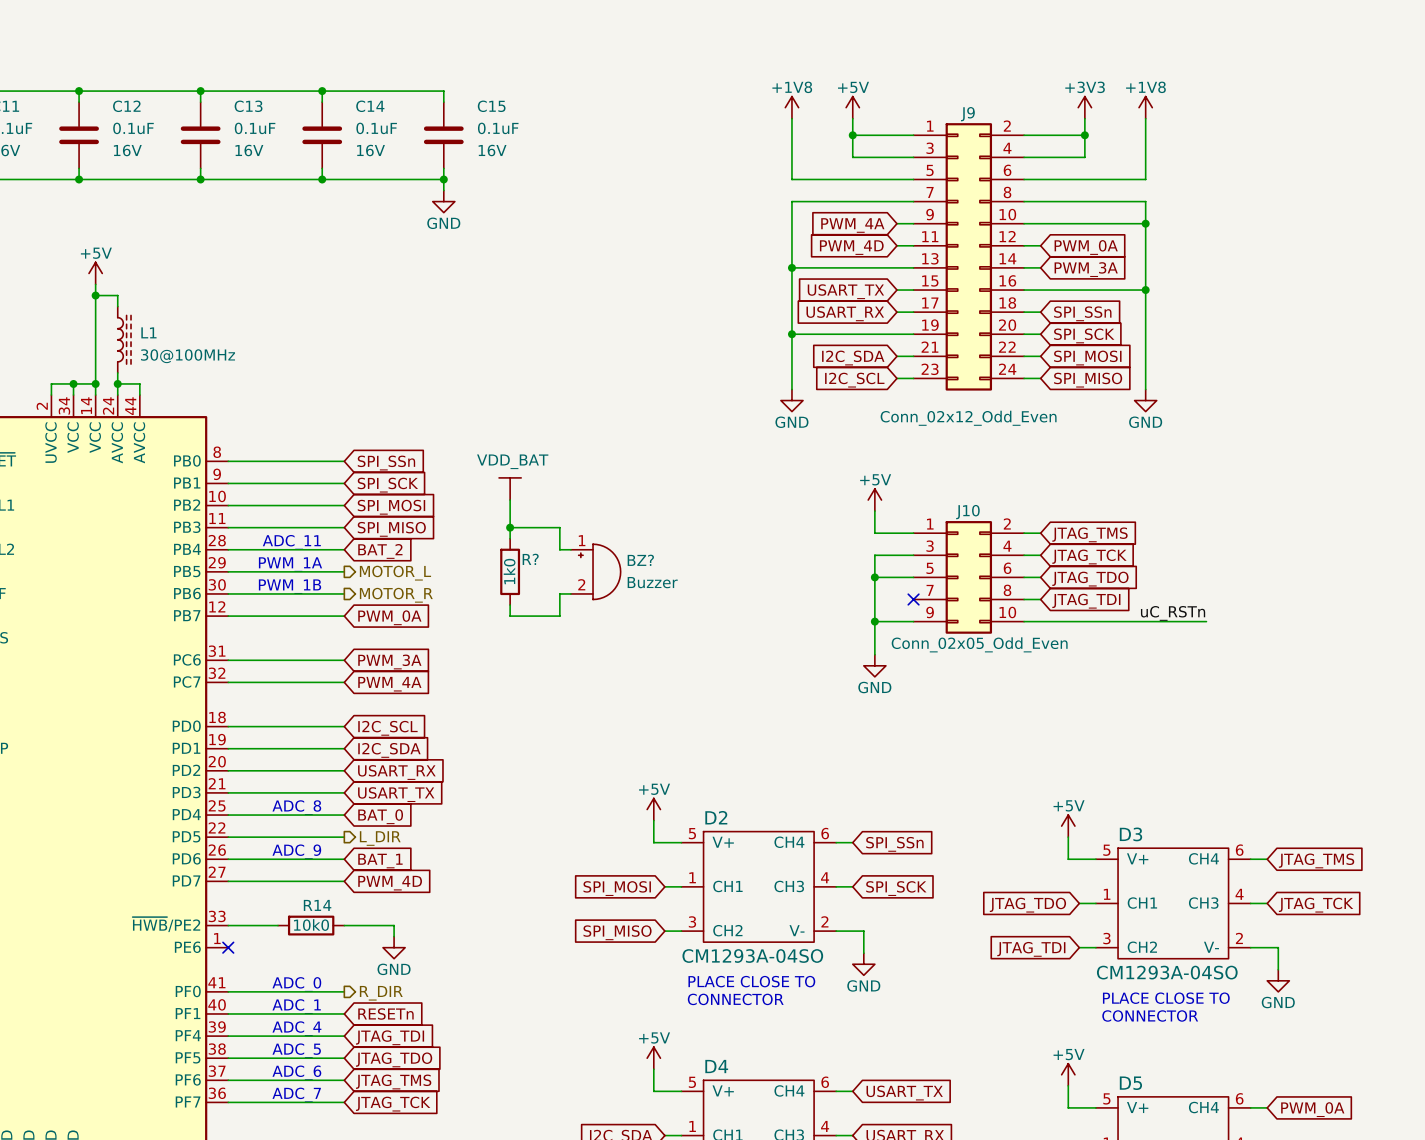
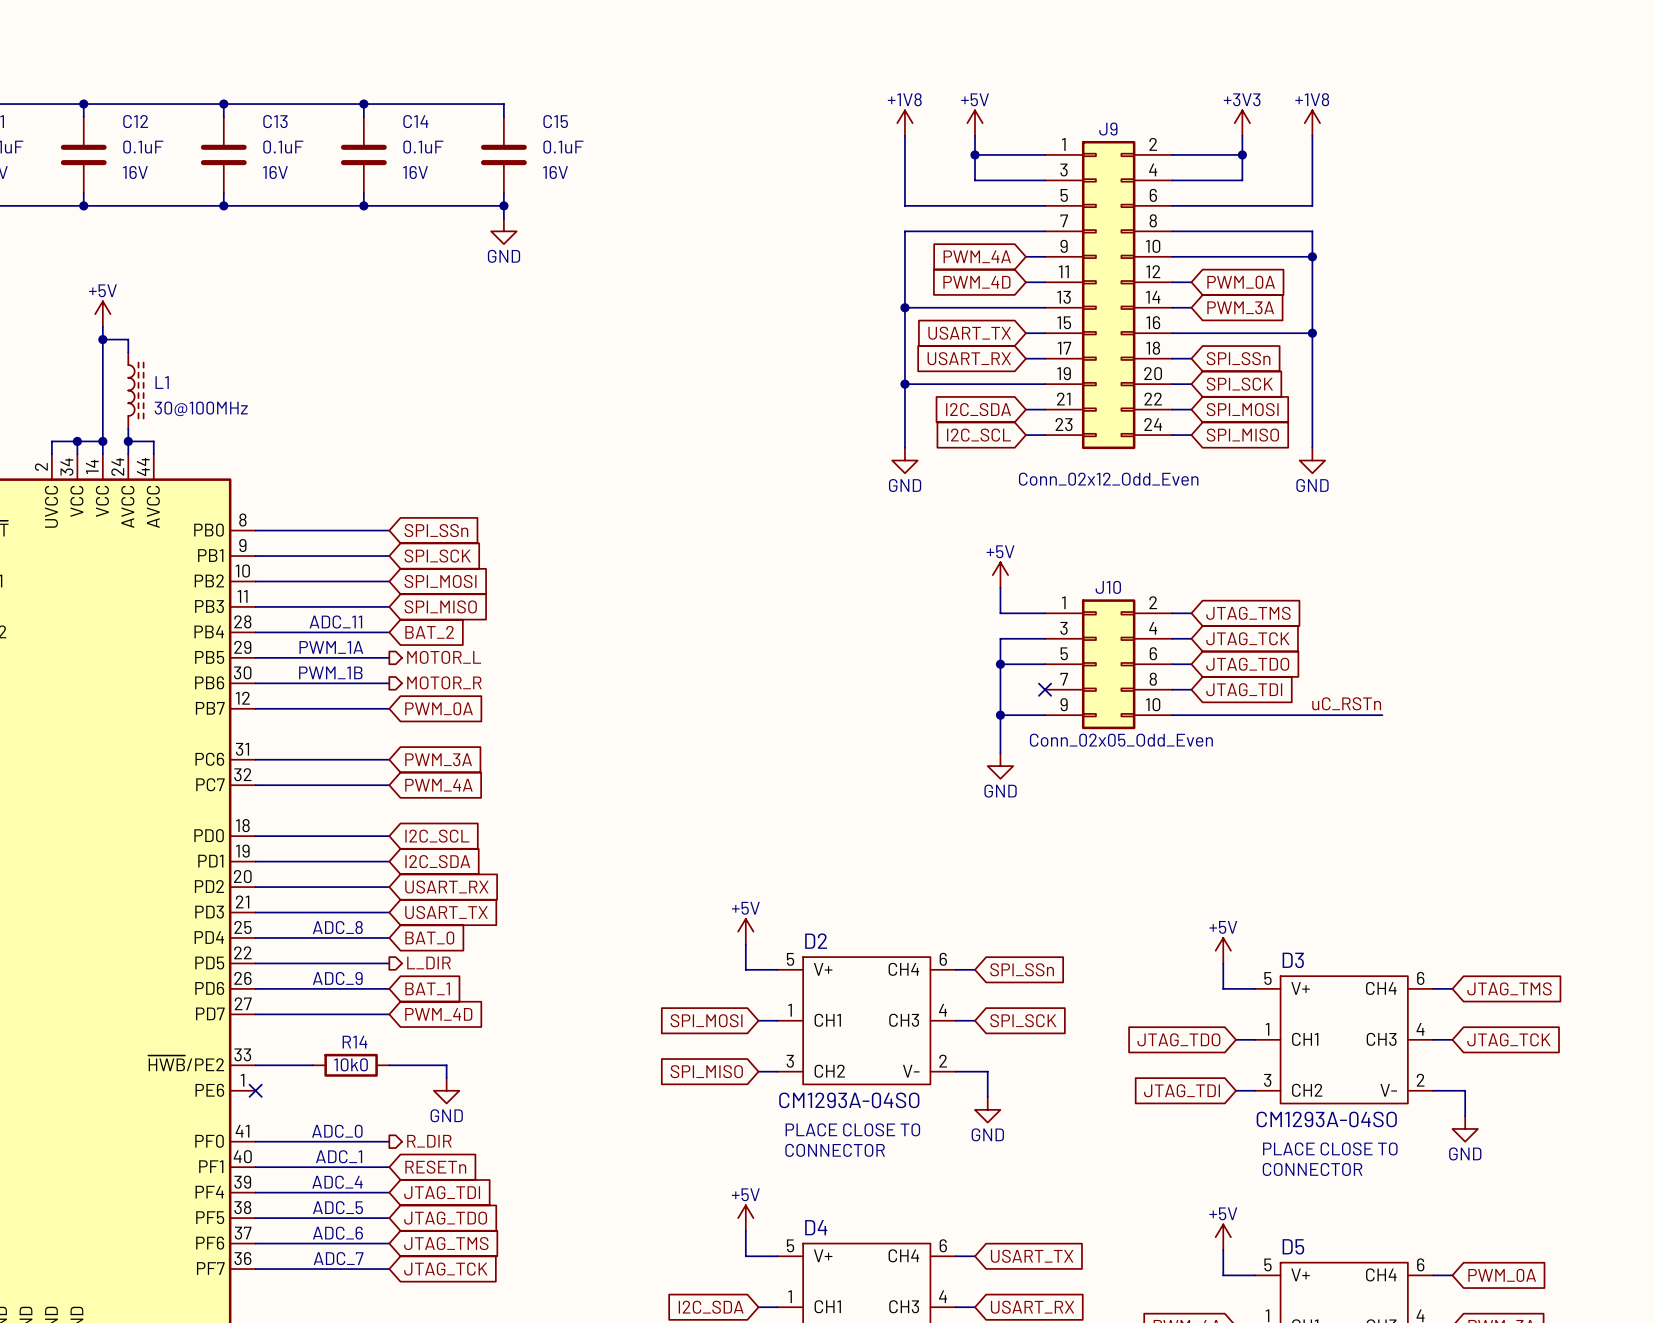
power symbol: VDD_BAT (510, 488) -> none
wire: (510, 500) (510, 538) -> none
wire: (510, 527) (559, 527) (559, 549) (570, 549) -> none
junction: (510, 527) -> none
R?: (510, 571) -> none
BZ?: Buzzer (595, 571) -> none
wire: (570, 593) (559, 593) (559, 616) (510, 616) (510, 605) -> none

